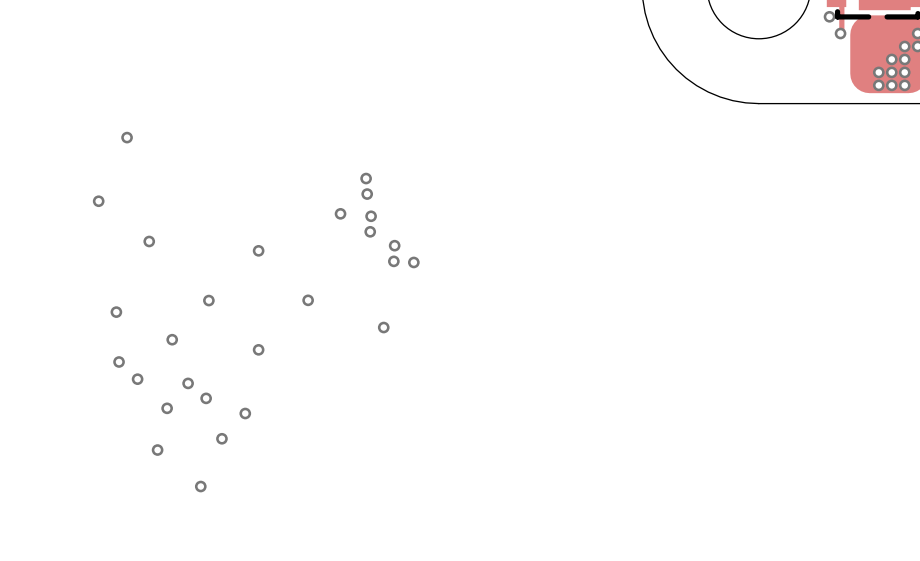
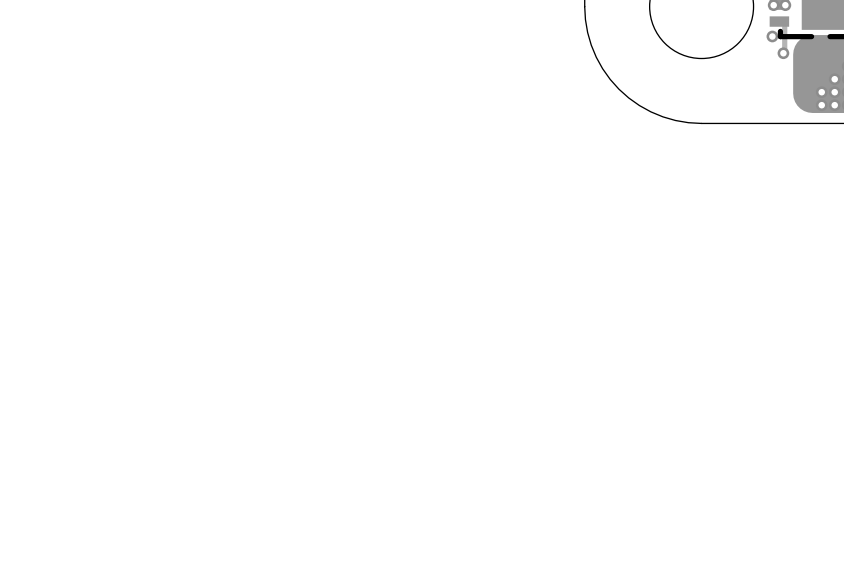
via: (127, 137) -> none
via: (366, 178) -> none
via: (367, 194) -> none
via: (98, 201) -> none
via: (340, 213) -> none
via: (371, 216) -> none
via: (370, 231) -> none
via: (149, 241) -> none
via: (394, 245) -> none
via: (258, 250) -> none
via: (393, 261) -> none
via: (413, 262) -> none
via: (208, 300) -> none
via: (308, 300) -> none
via: (116, 312) -> none
via: (383, 327) -> none
via: (172, 339) -> none
via: (258, 349) -> none
via: (119, 361) -> none
via: (137, 379) -> none
via: (188, 383) -> none
via: (206, 398) -> none
via: (167, 408) -> none
via: (245, 413) -> none
via: (221, 438) -> none
via: (157, 450) -> none
via: (200, 486) -> none

